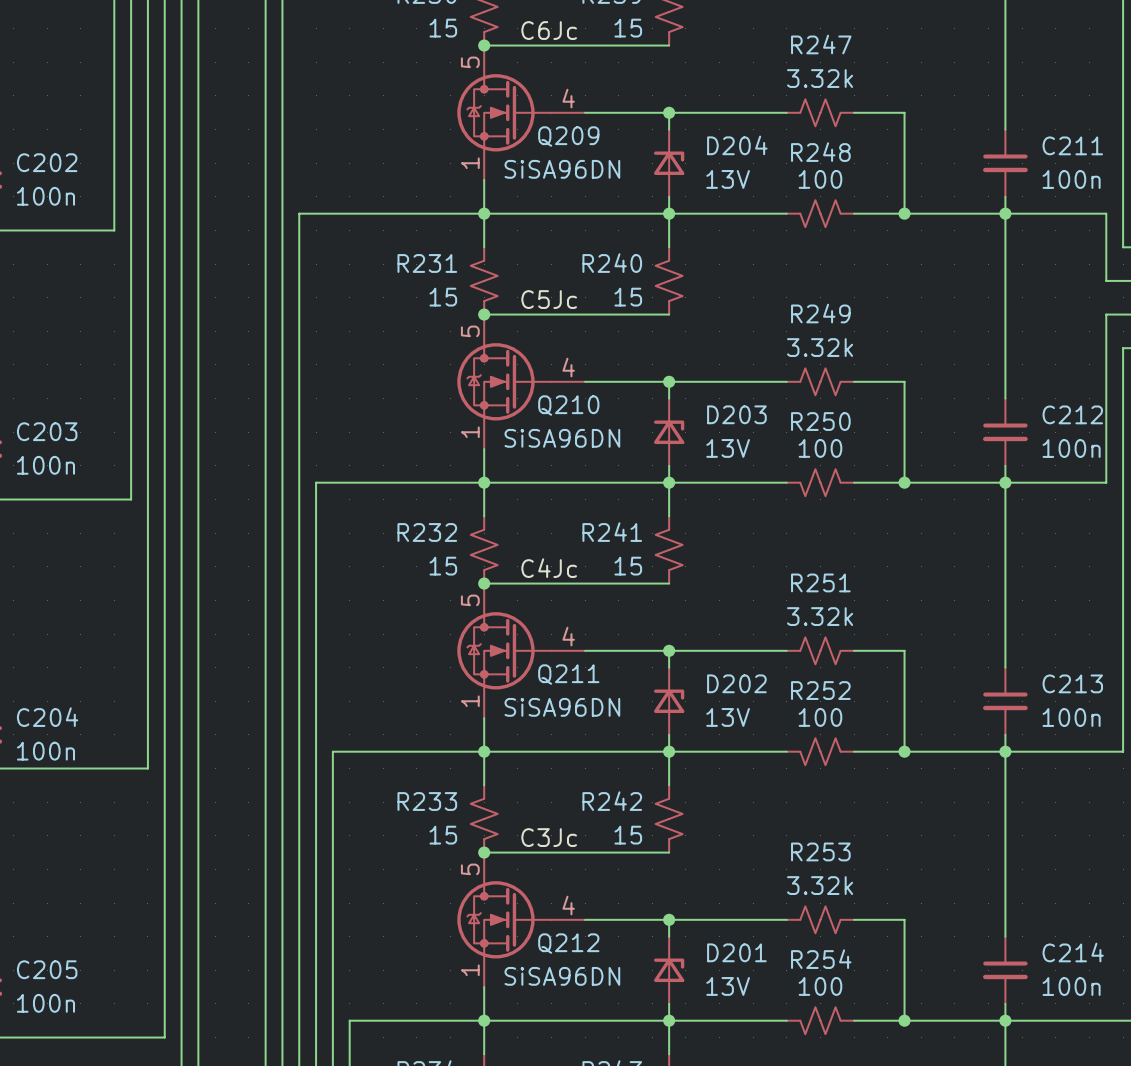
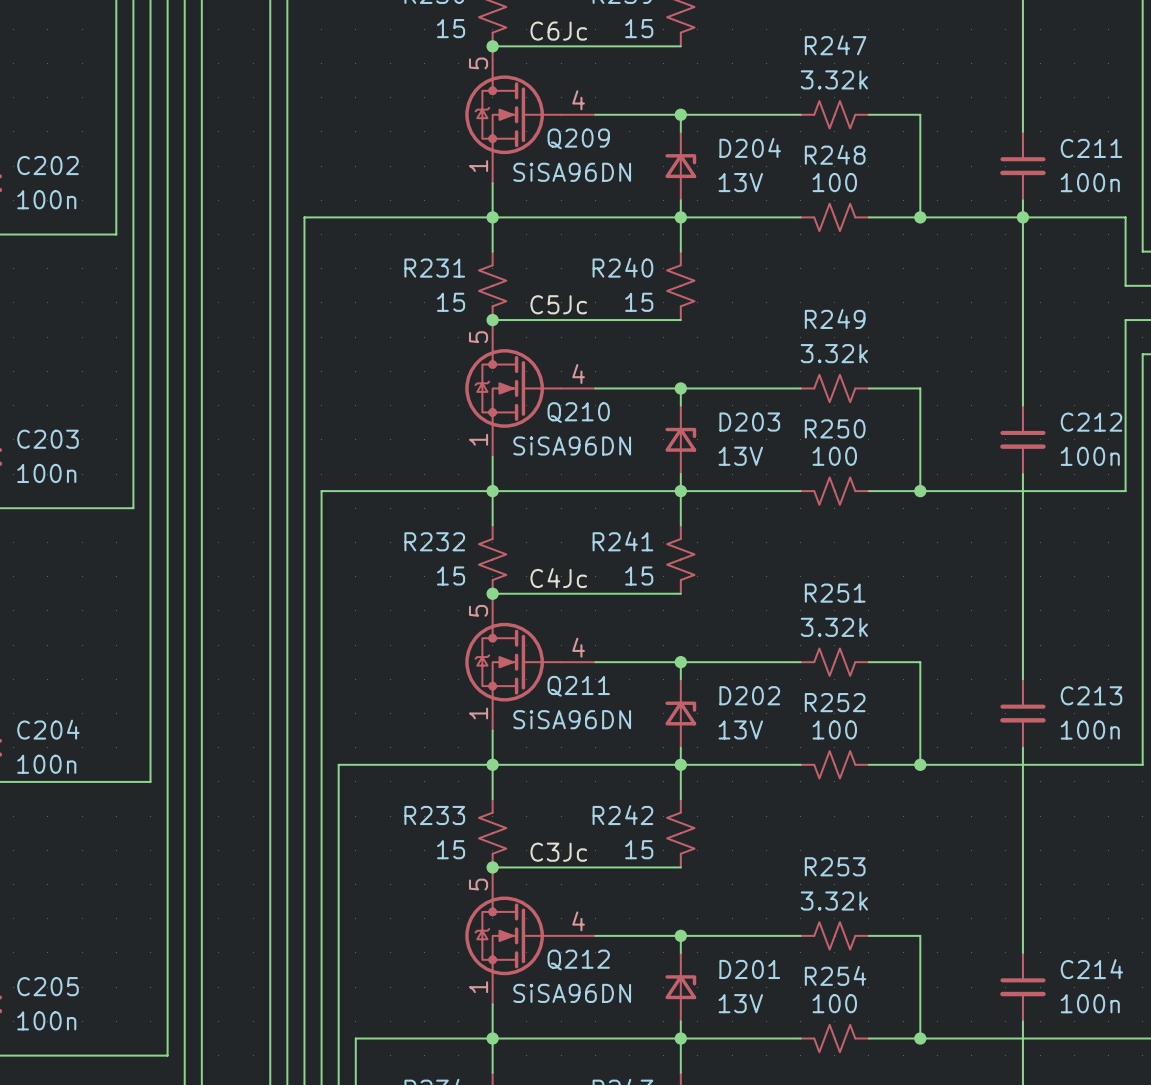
junction: (1005, 482) -> none
junction: (1005, 751) -> none
junction: (1005, 1020) -> none

